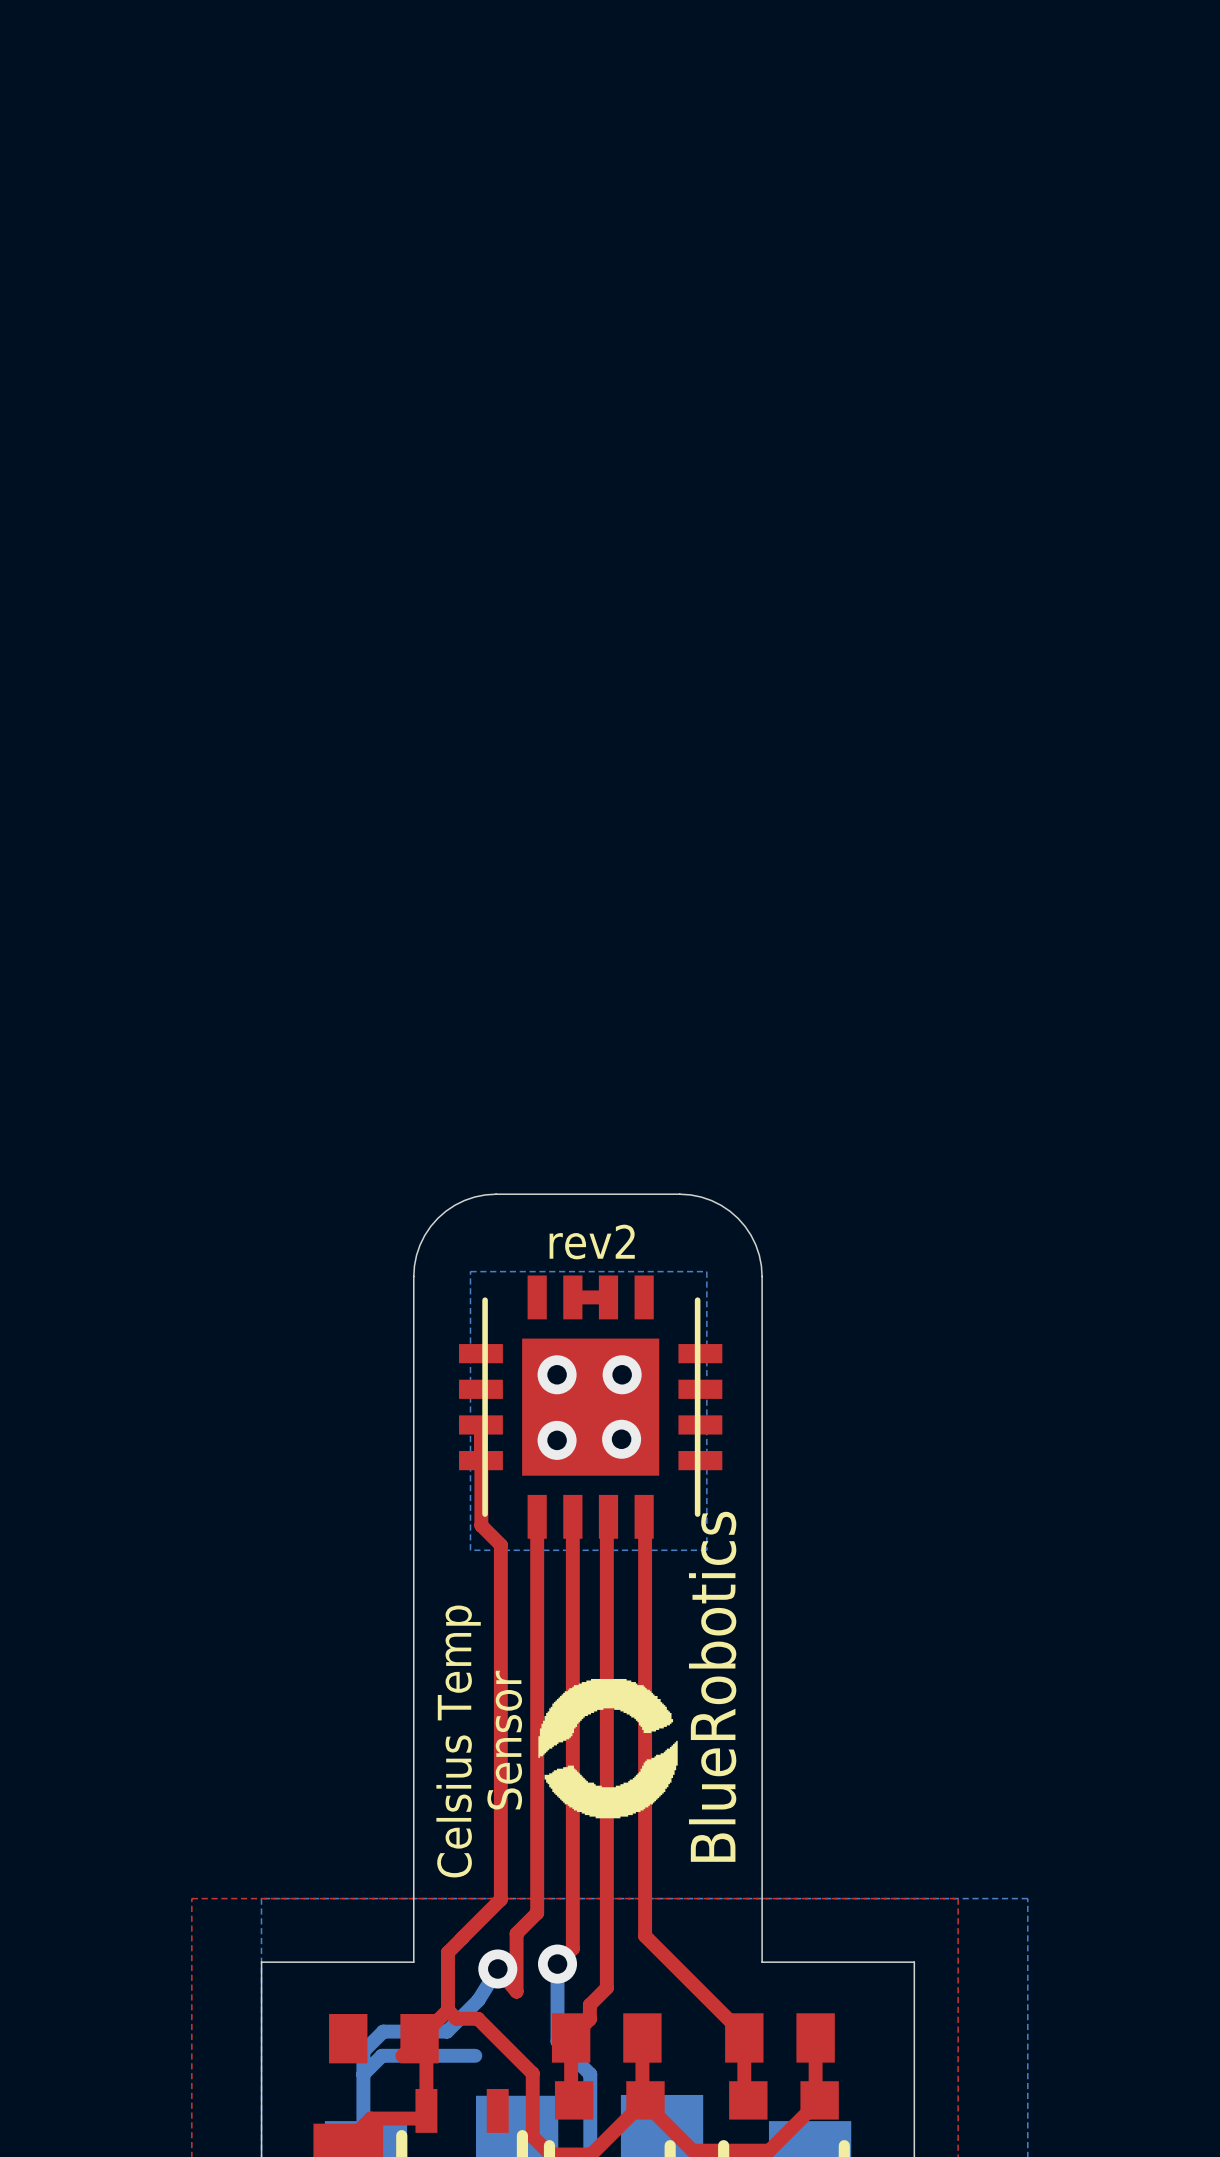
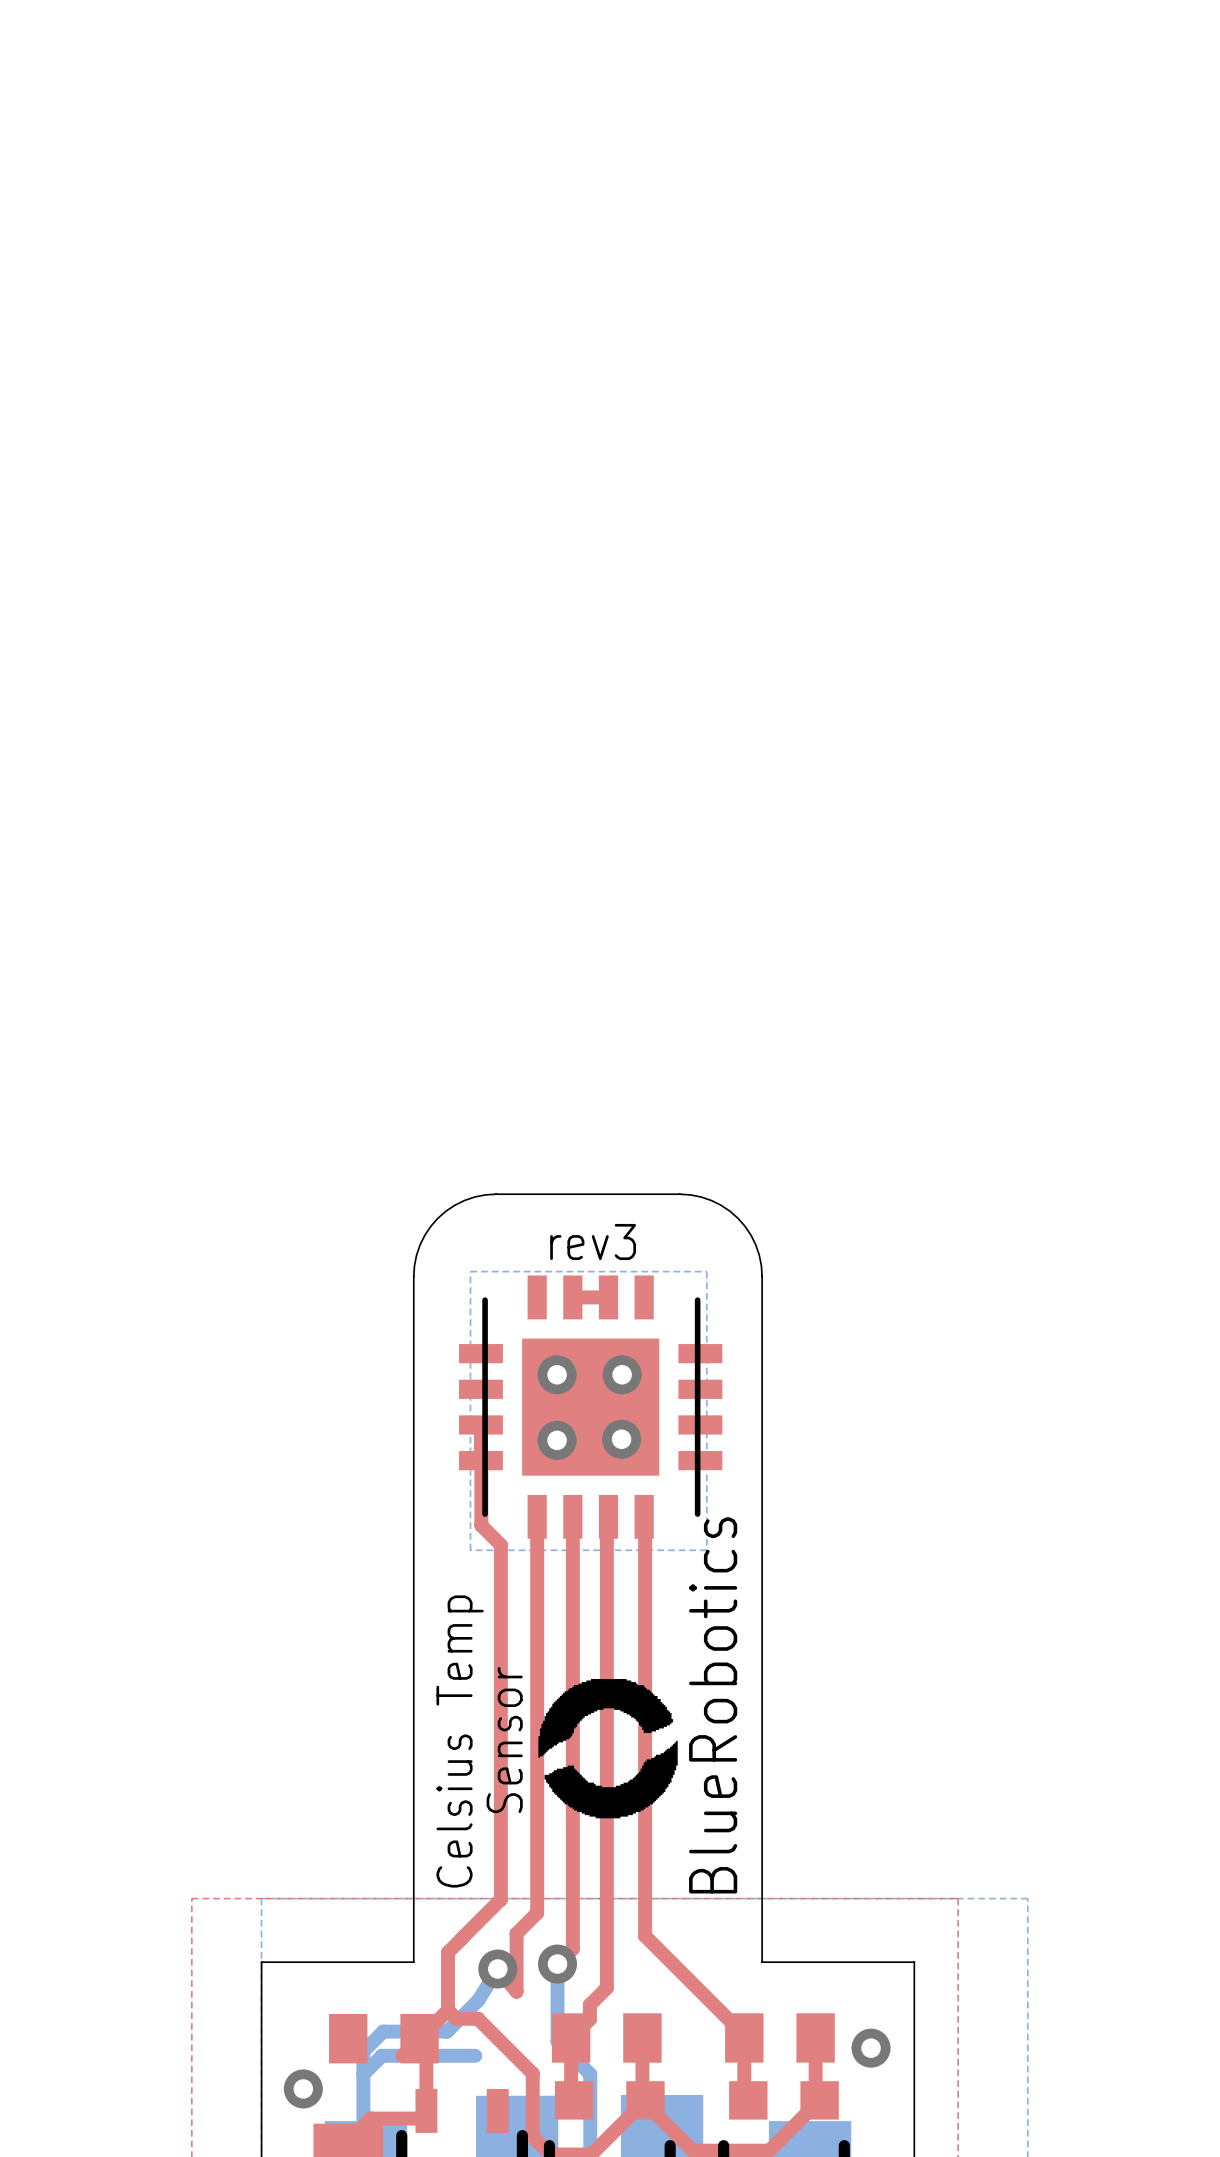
text: rev2 (592, 1242) -> rev3 (593, 1241)
via: none -> (871, 2048)
via: none -> (303, 2088)

